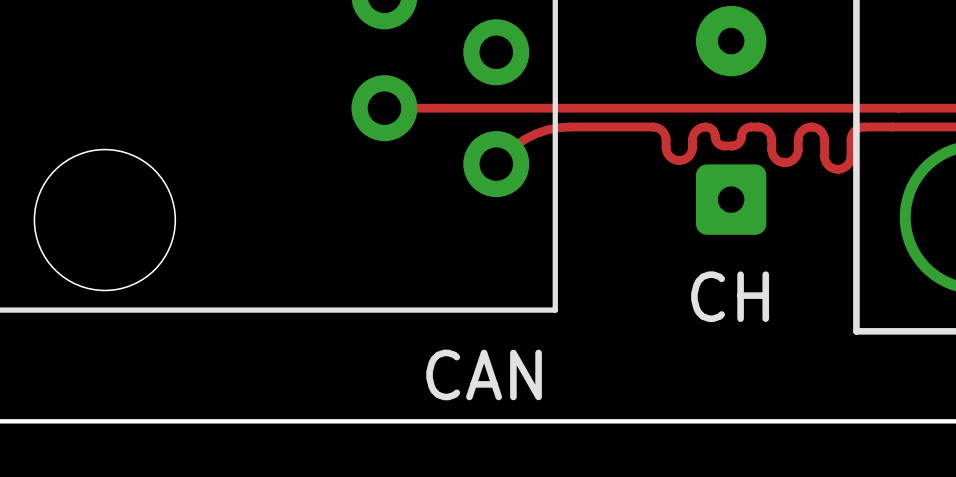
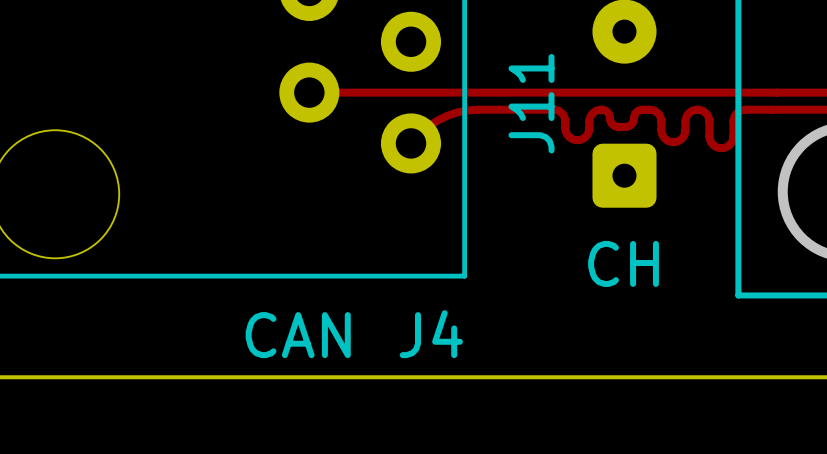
J11 name: none -> J11 (531, 103)
J4 name: none -> J4 (431, 334)
J4 value position: CAN (484, 374) -> CAN (298, 335)

